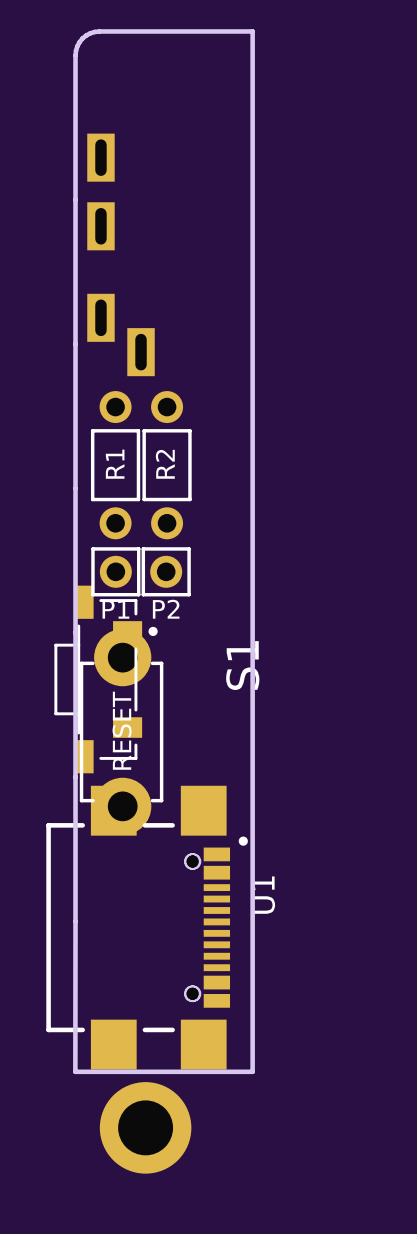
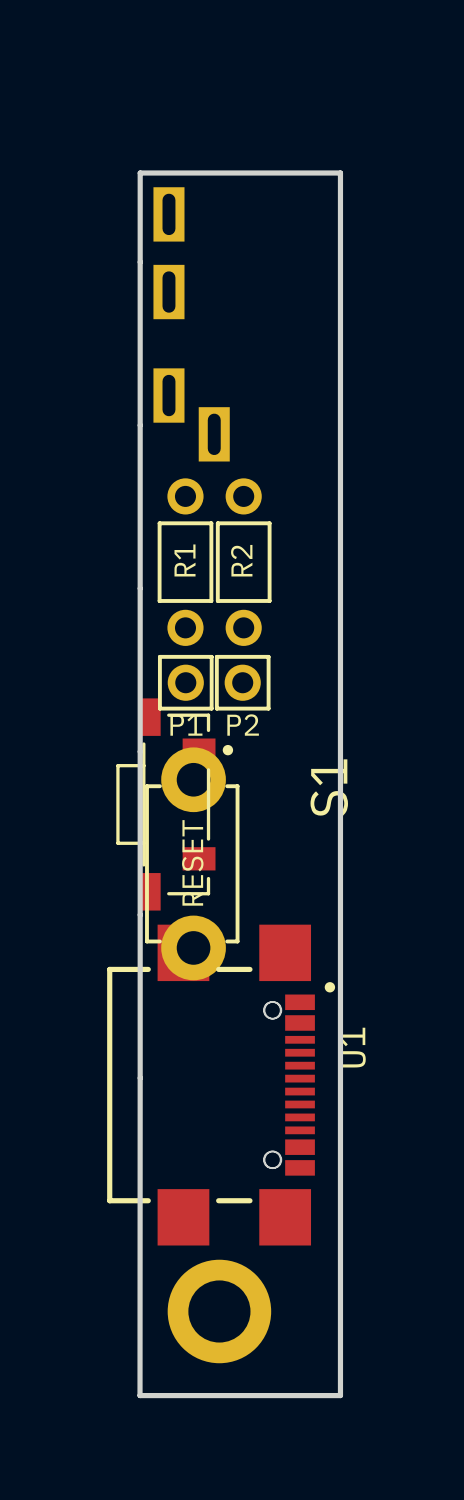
board edge: (252, 121) (252, 31) (99, 31) (90, 33) (79, 42) (75, 55) (75, 199) -> (340, 173) (140, 173) (140, 262)
board edge: (75, 921) (75, 1071) (252, 1071) -> (140, 1078) (140, 1395) (340, 1395) (340, 1248)

